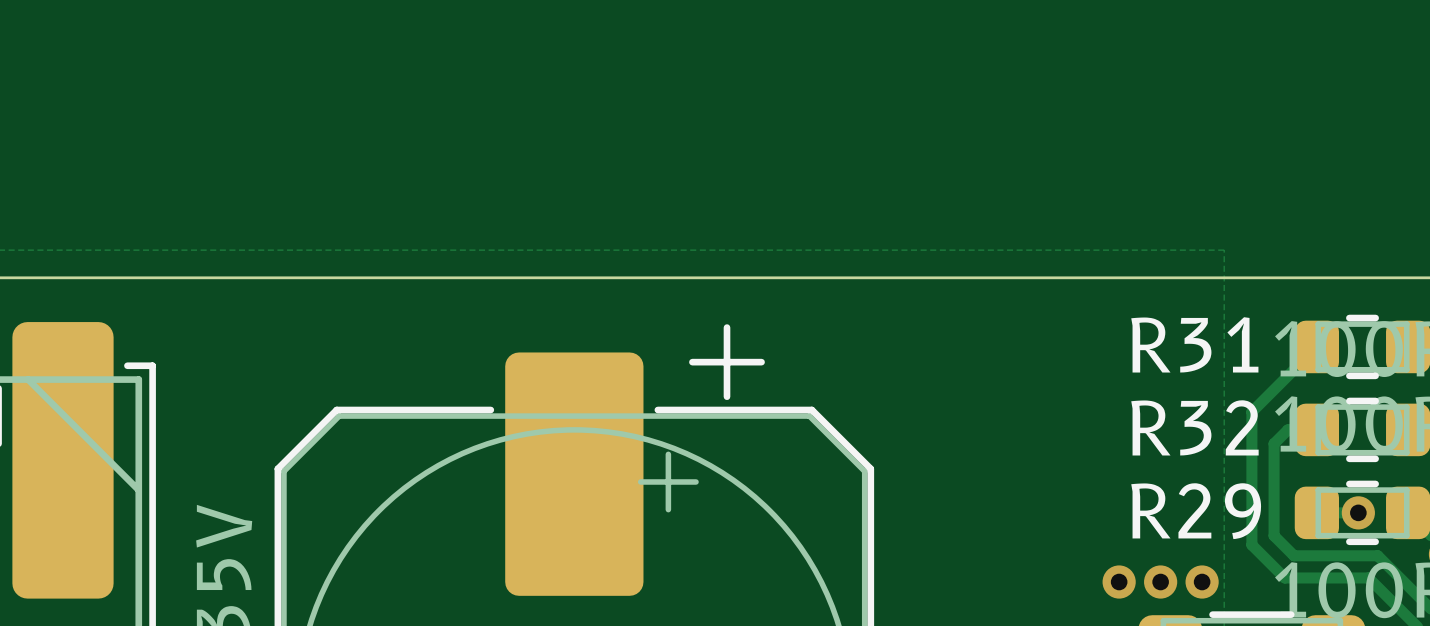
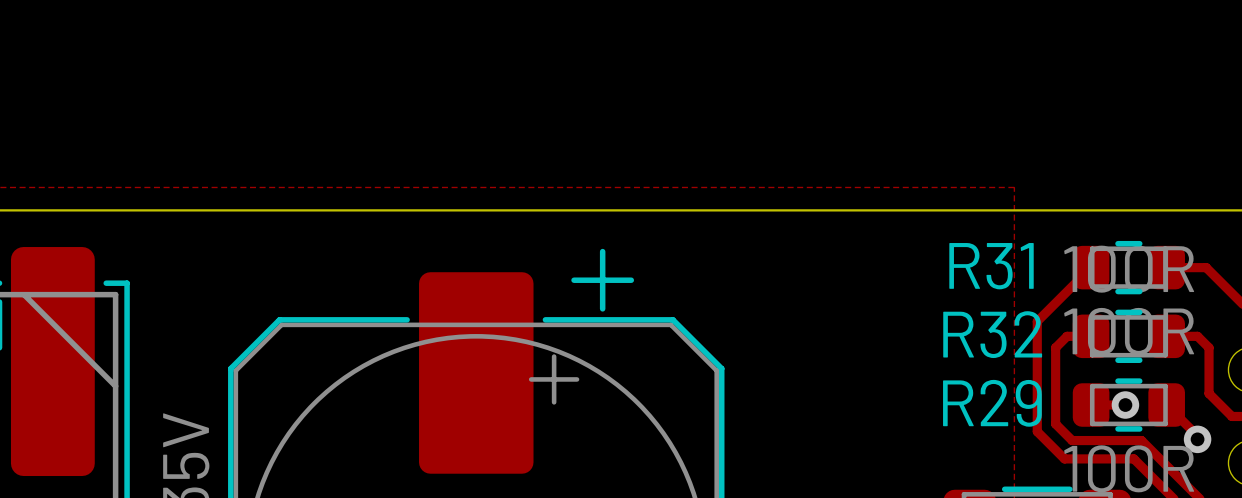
via: (1119, 582) -> none
via: (1160, 582) -> none
via: (1202, 582) -> none

